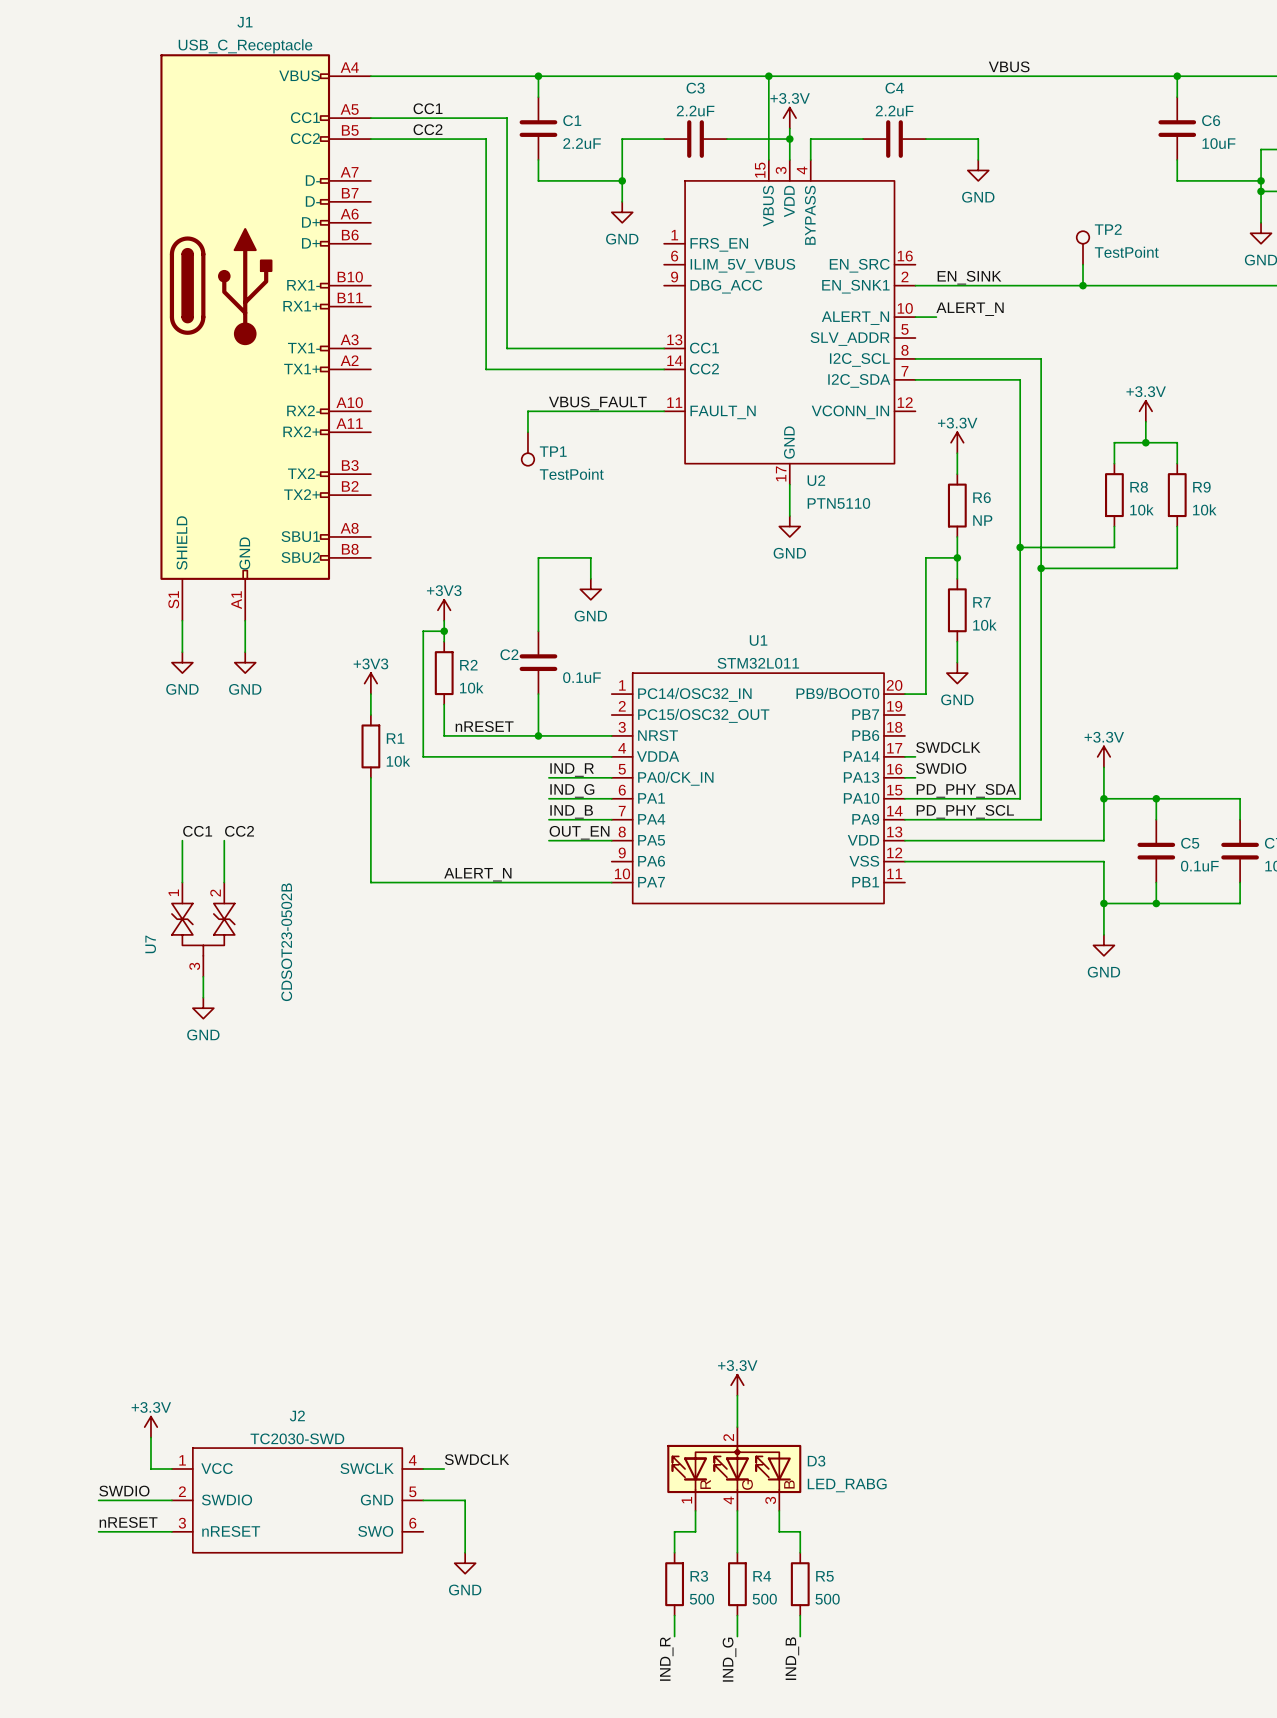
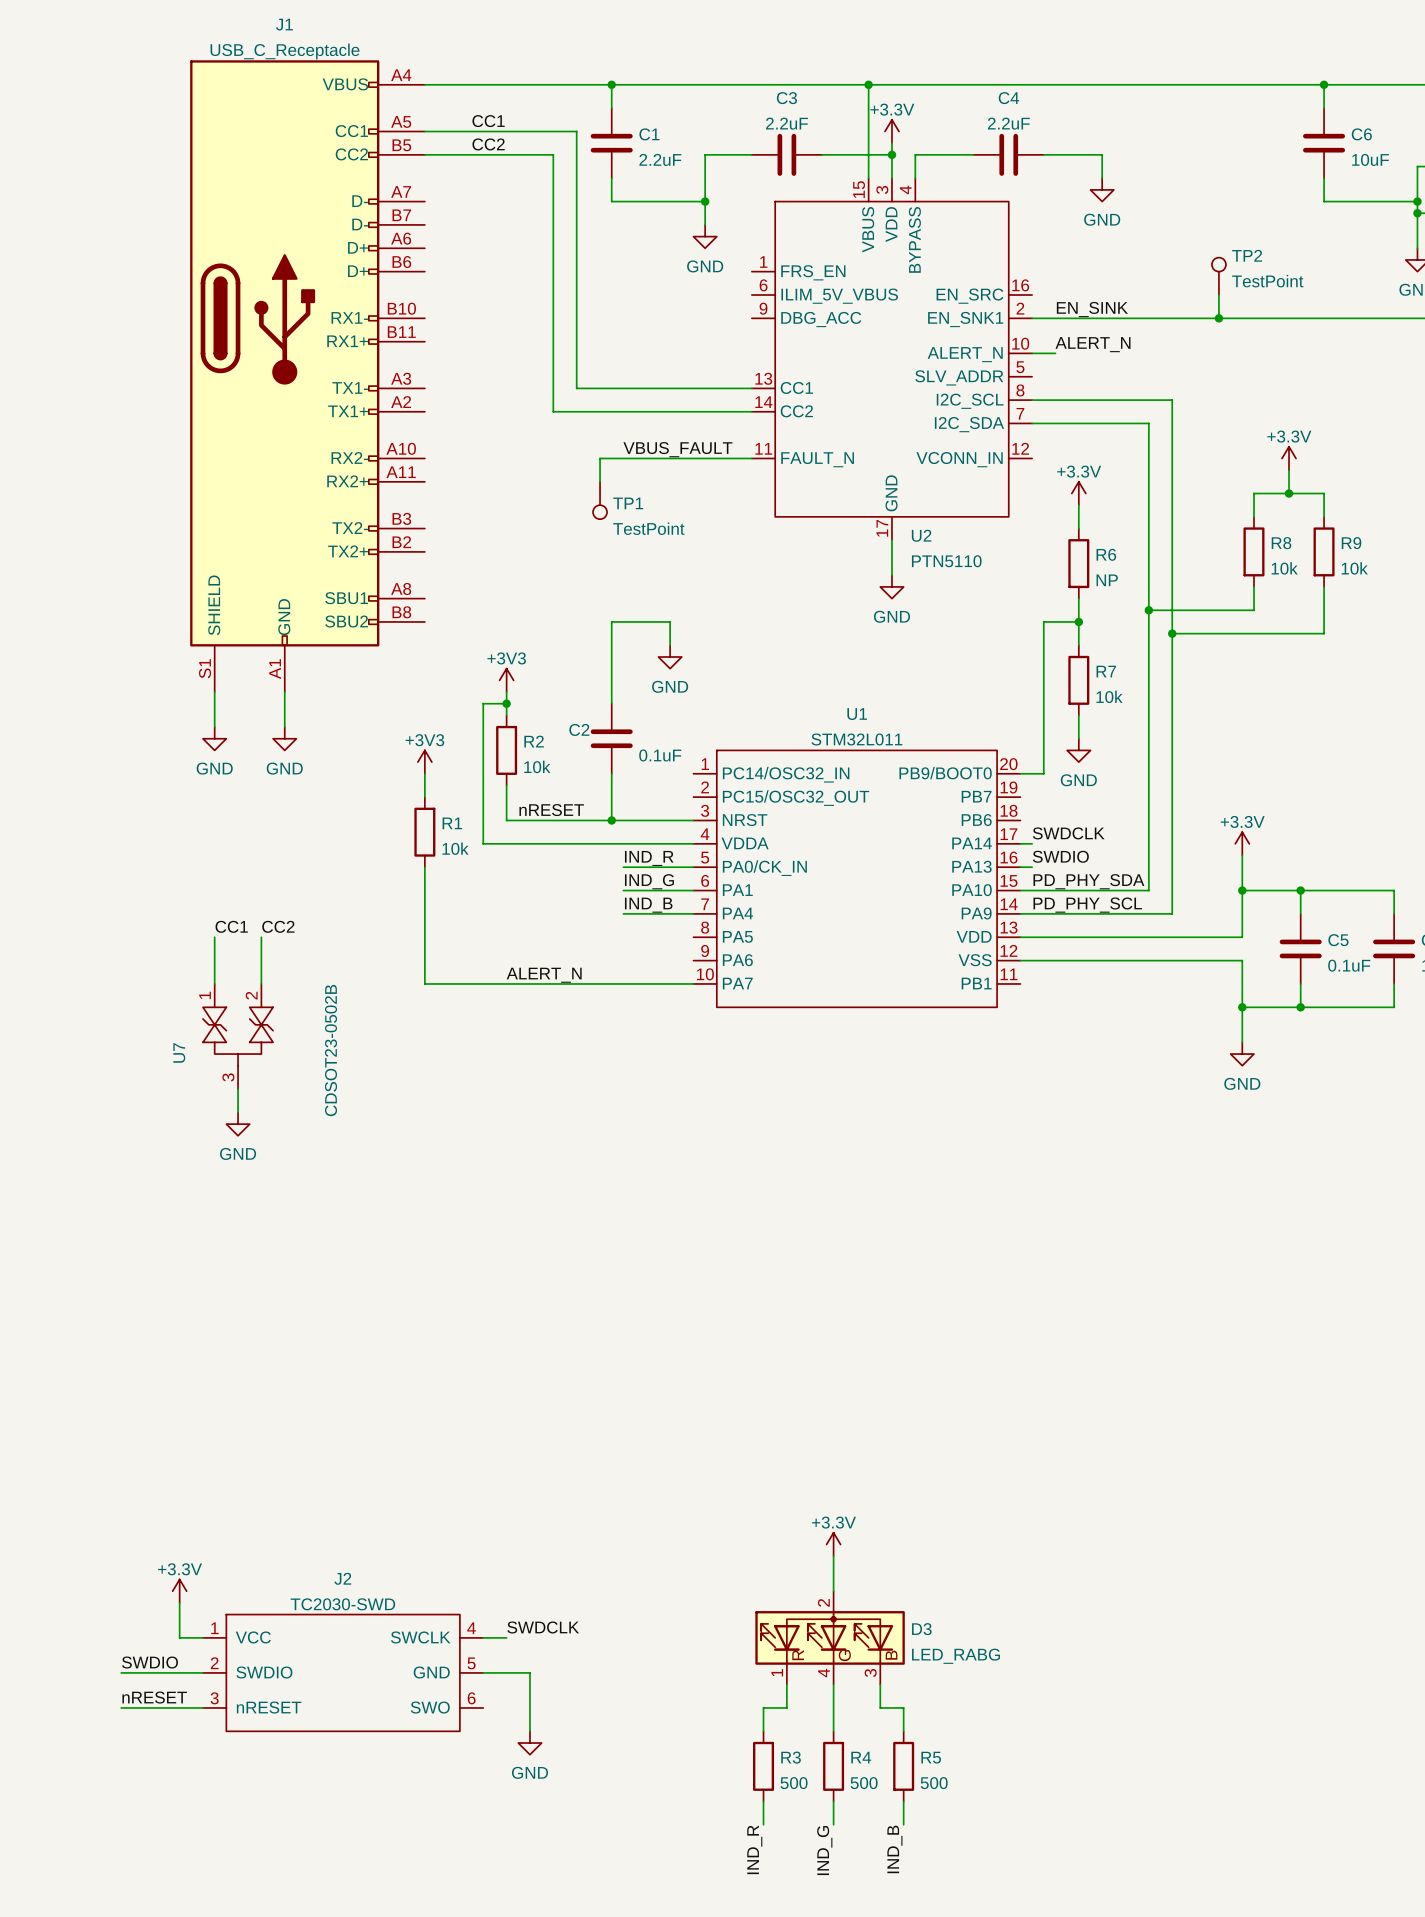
label: VBUS (1009, 66) -> none
label: OUT_EN (579, 832) -> none
wire: (548, 840) (611, 840) -> none

